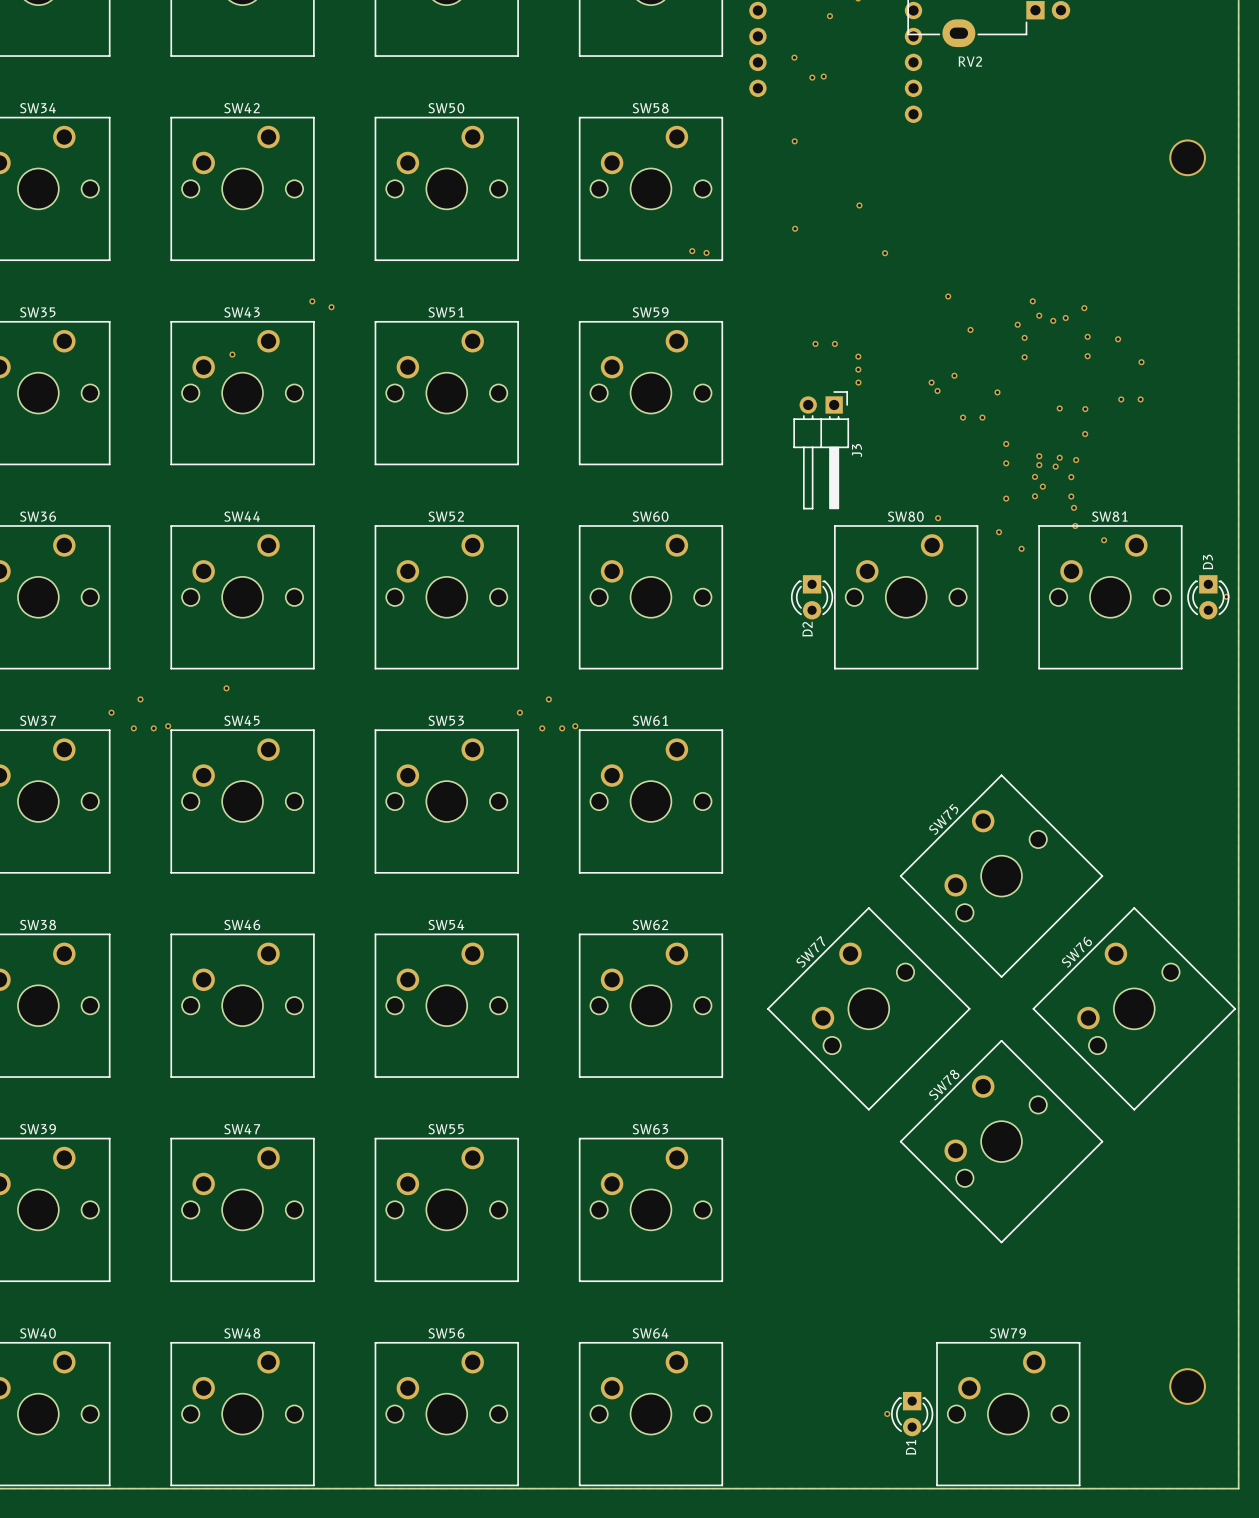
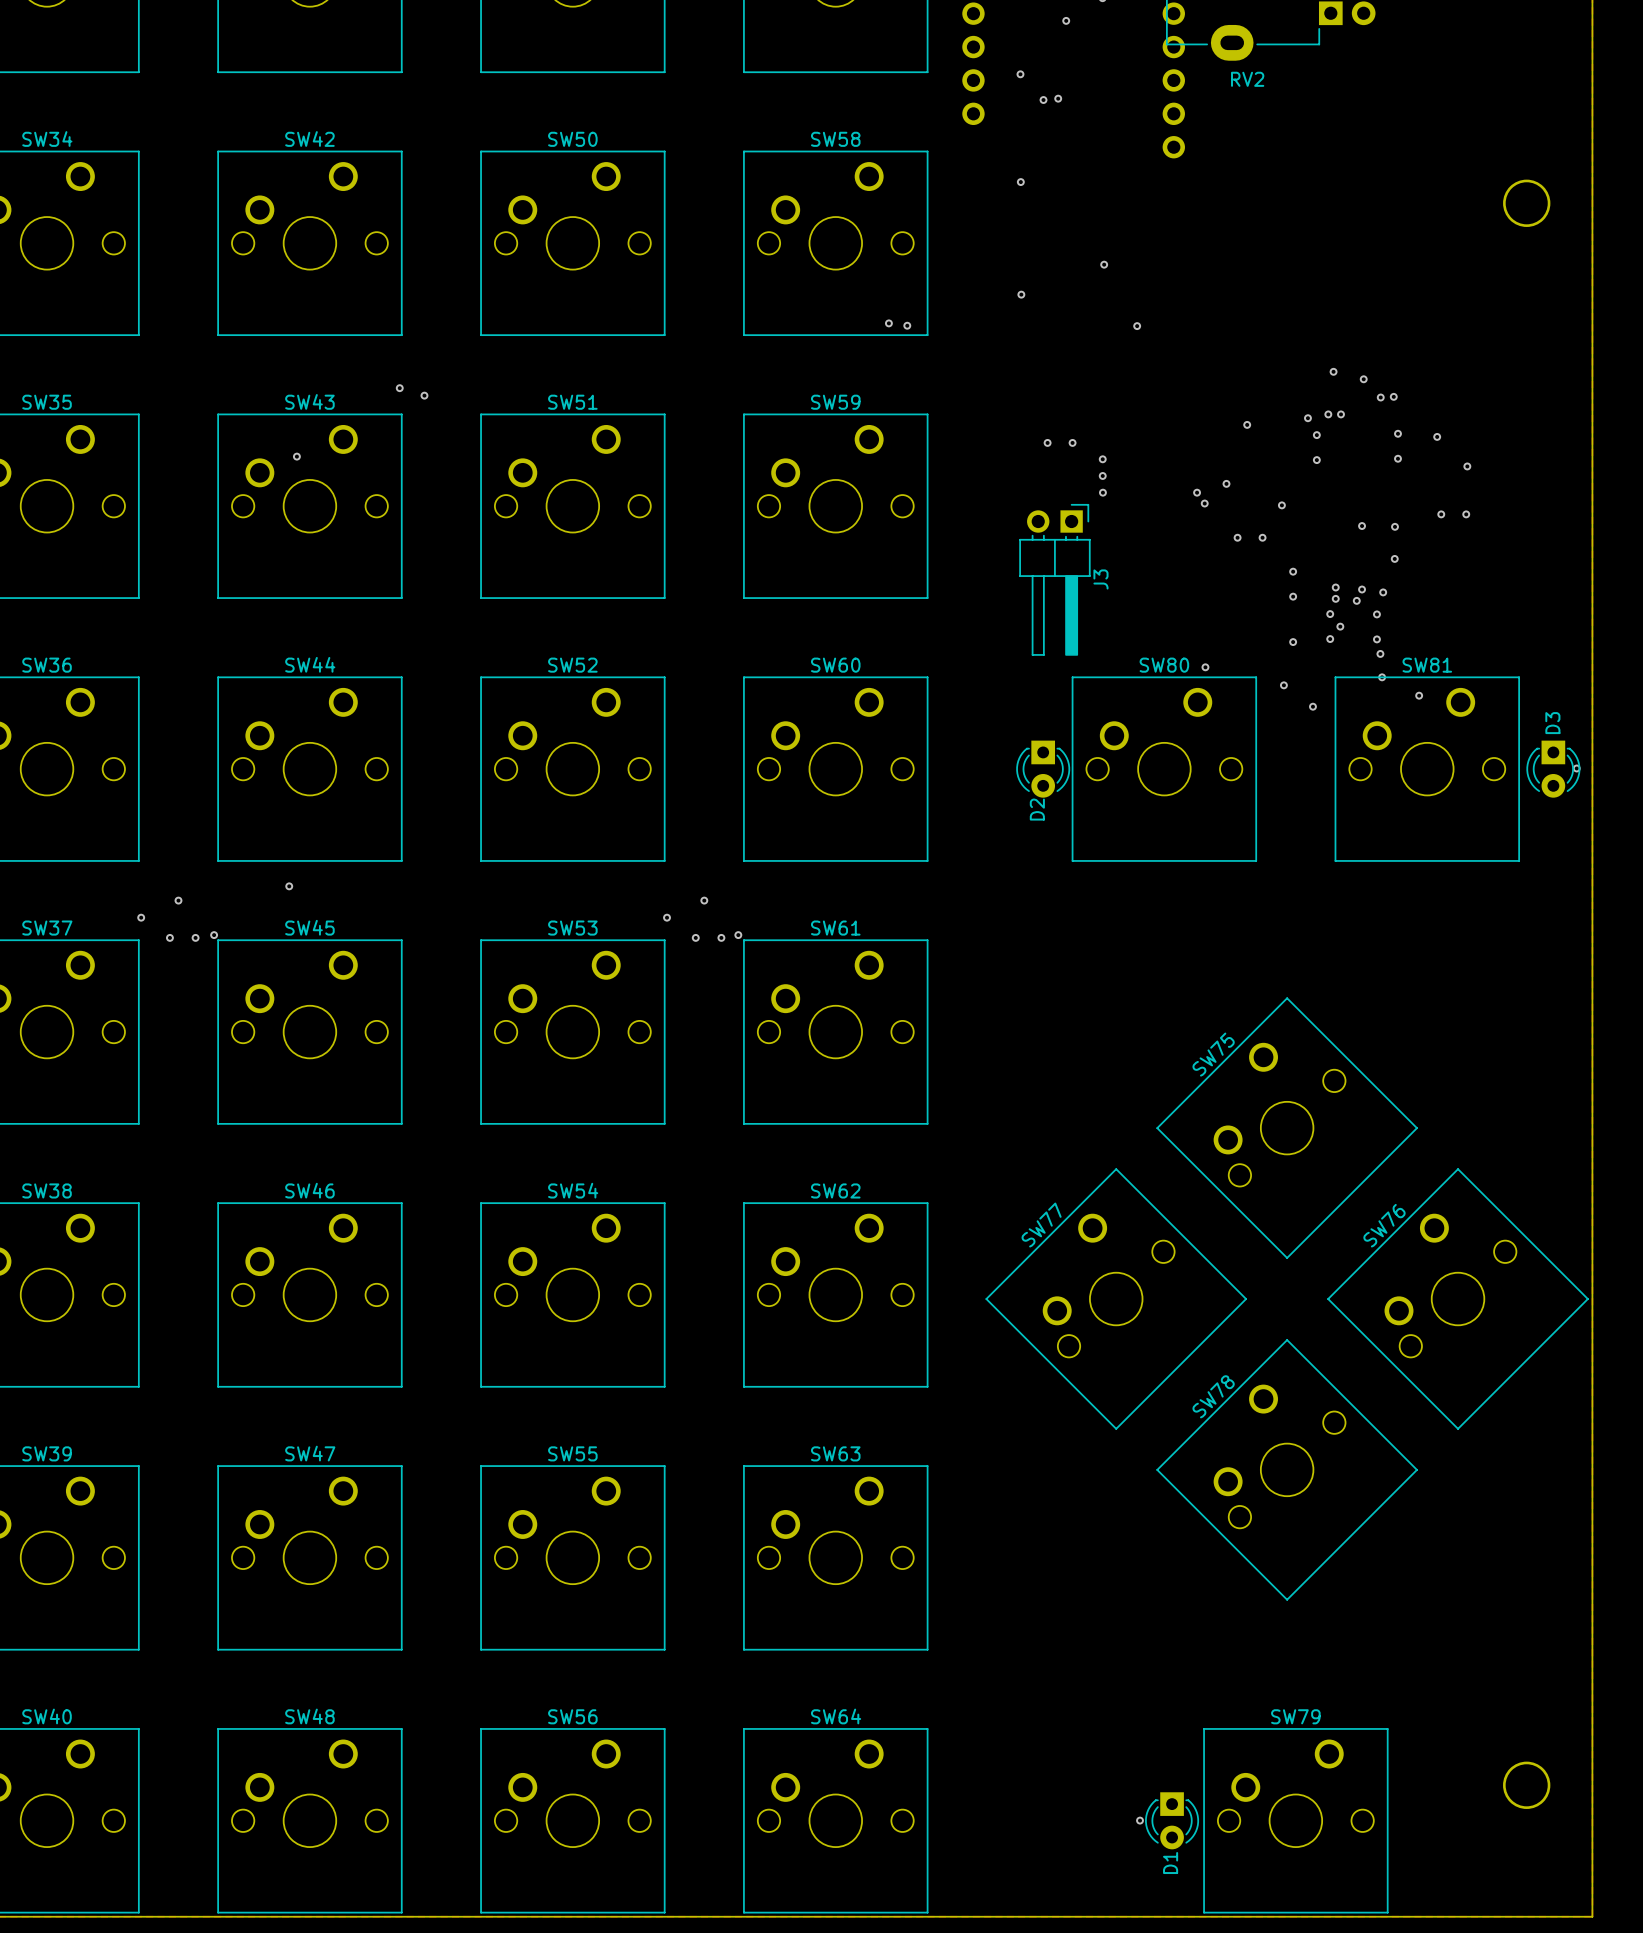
via: none -> (1333, 371)
via: none -> (1363, 379)
via: (948, 296) -> none
via: (1032, 301) -> none
via: none -> (1380, 397)
via: (1039, 315) -> none
via: (1065, 318) -> none
via: (1053, 320) -> none
via: none -> (1328, 414)
via: none -> (1341, 414)

